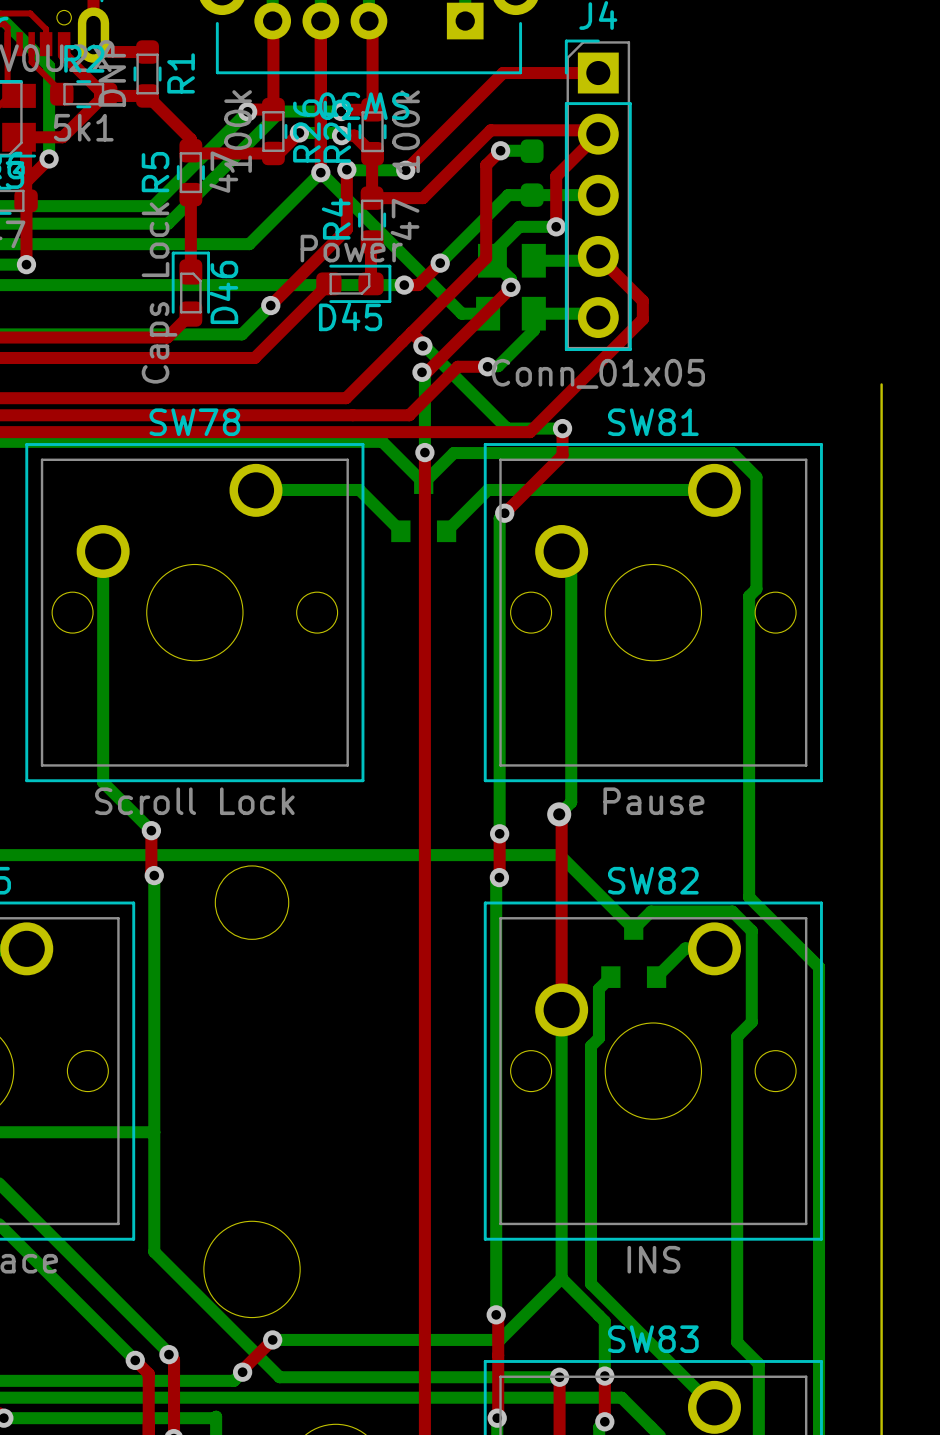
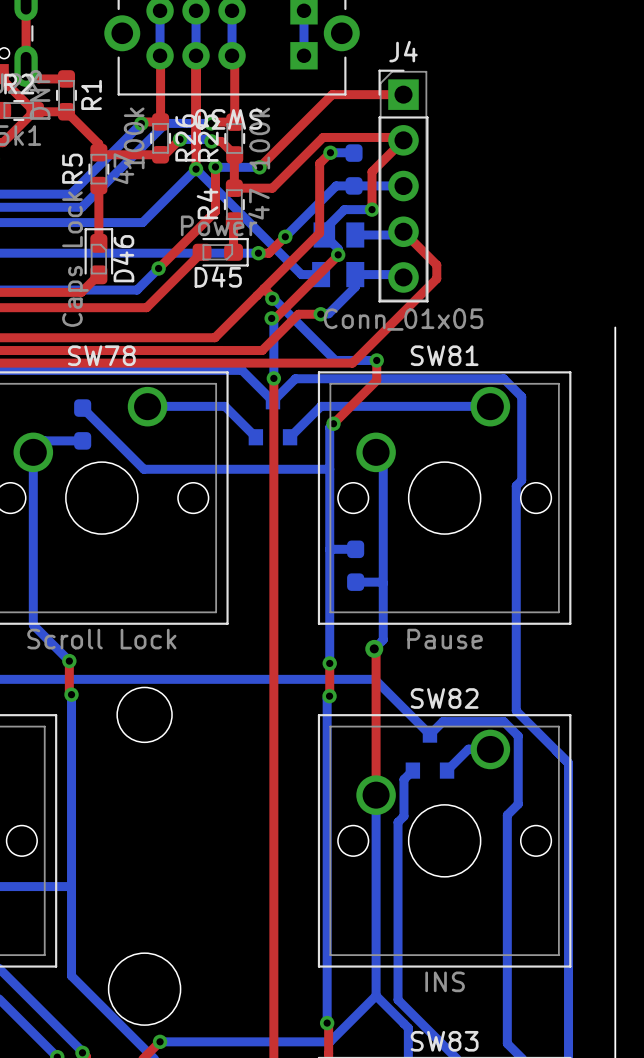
bottom track: none -> (82, 408) (143, 469) (329, 469)
part: none -> (82, 424)
bottom track: none -> (82, 440) (44, 440) (33, 452)
bottom track: none -> (329, 549) (355, 549)
part: none -> (355, 565)
bottom track: none -> (355, 582) (383, 583)

